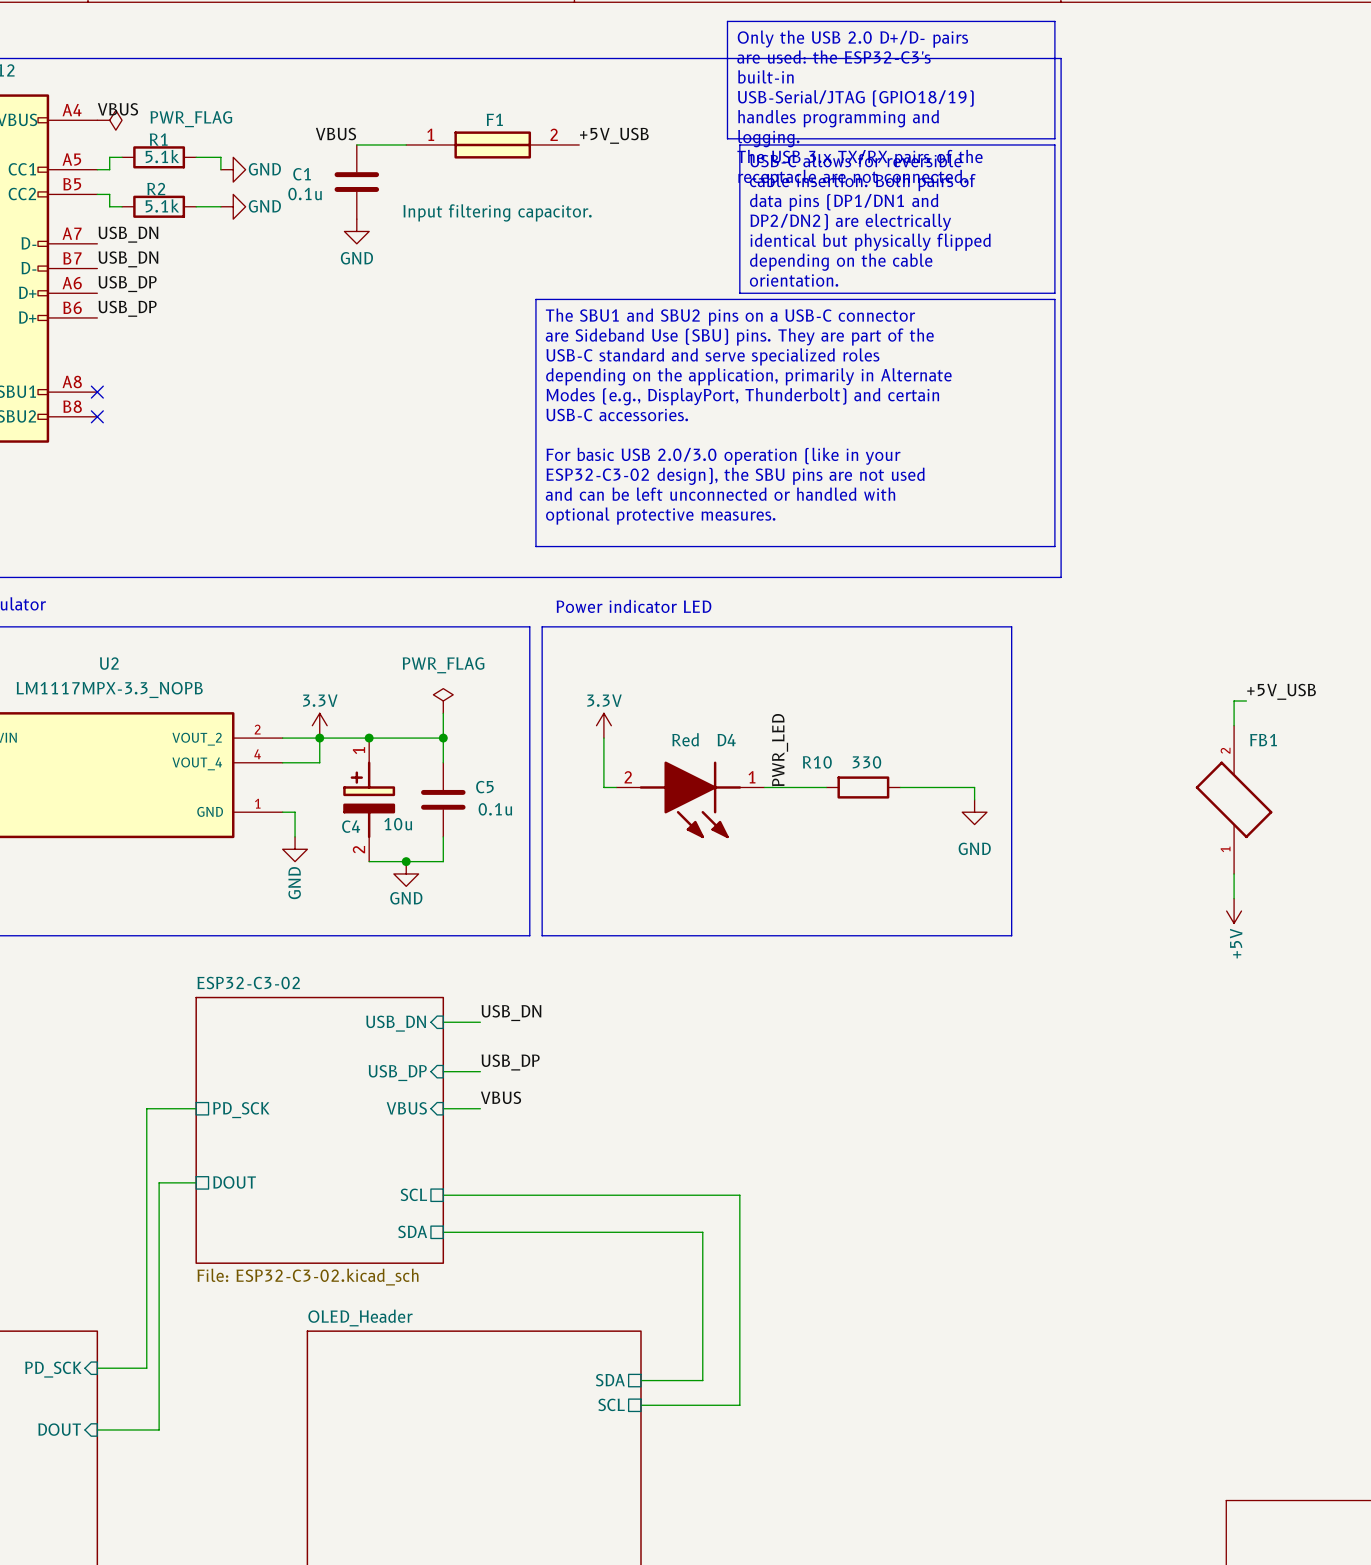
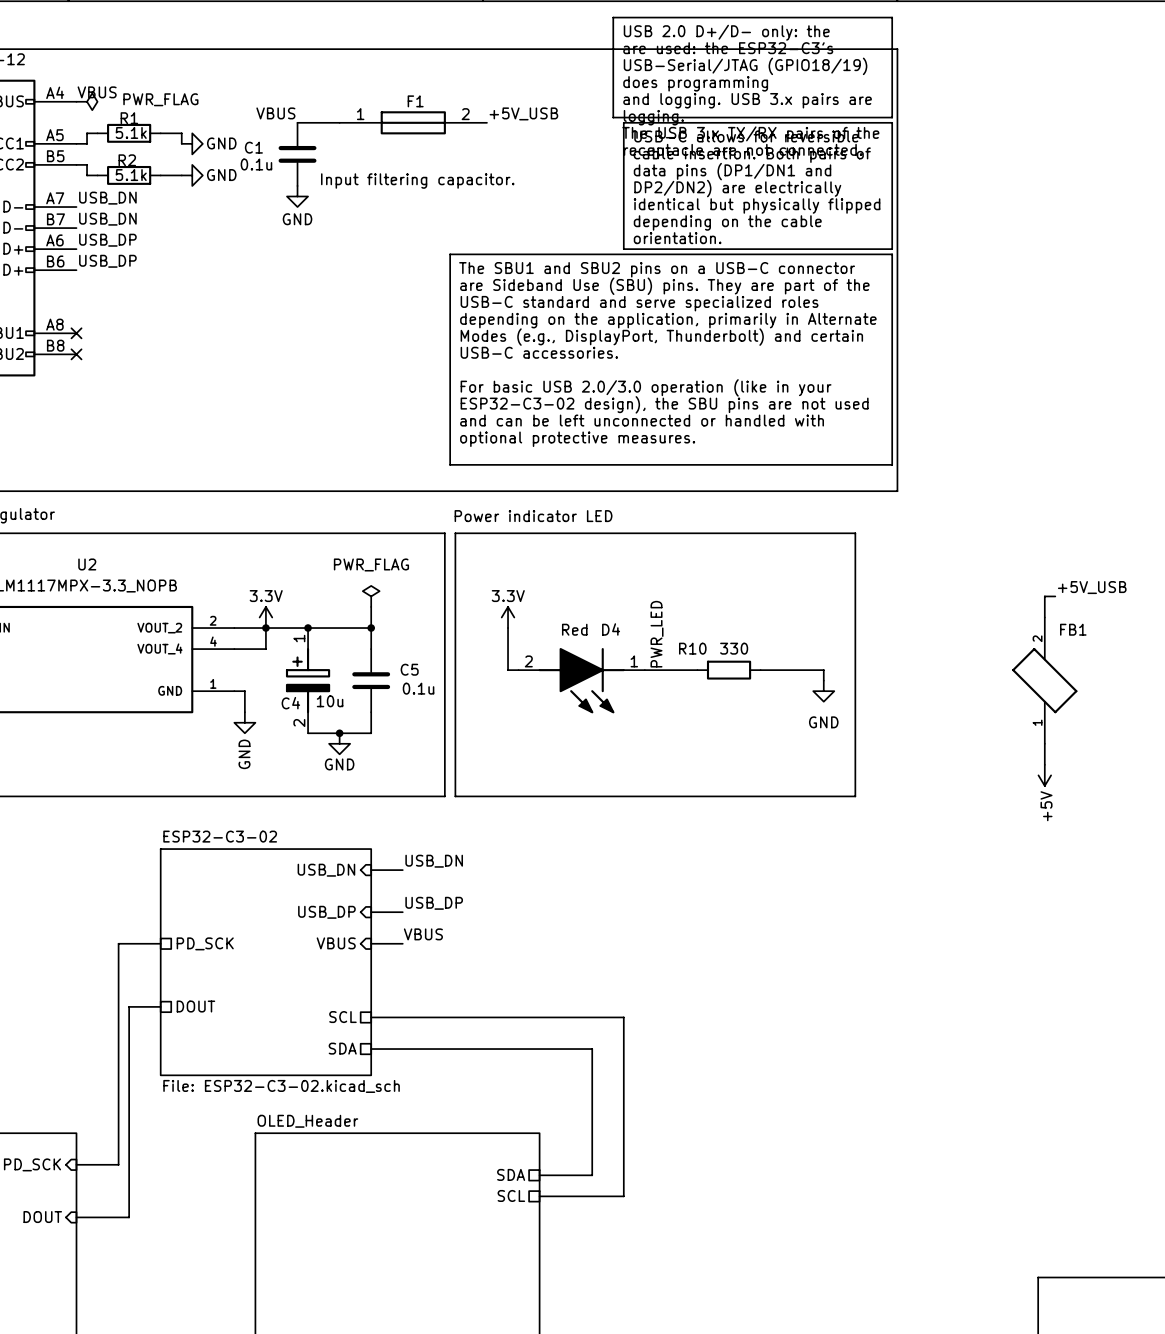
text: Only the USB 2.0 D+/D- pairs (852, 39) -> USB 2.0 D+/D- only: the (726, 32)
text: built-in (765, 76) -> USB-Serial/JTAG (GPIO18/19) (745, 66)
text: USB-Serial/JTAG (GPIO18/19) (855, 98) -> does programming (695, 83)
text: handles programming and (838, 118) -> and logging. USB 3.x pairs are (747, 100)

